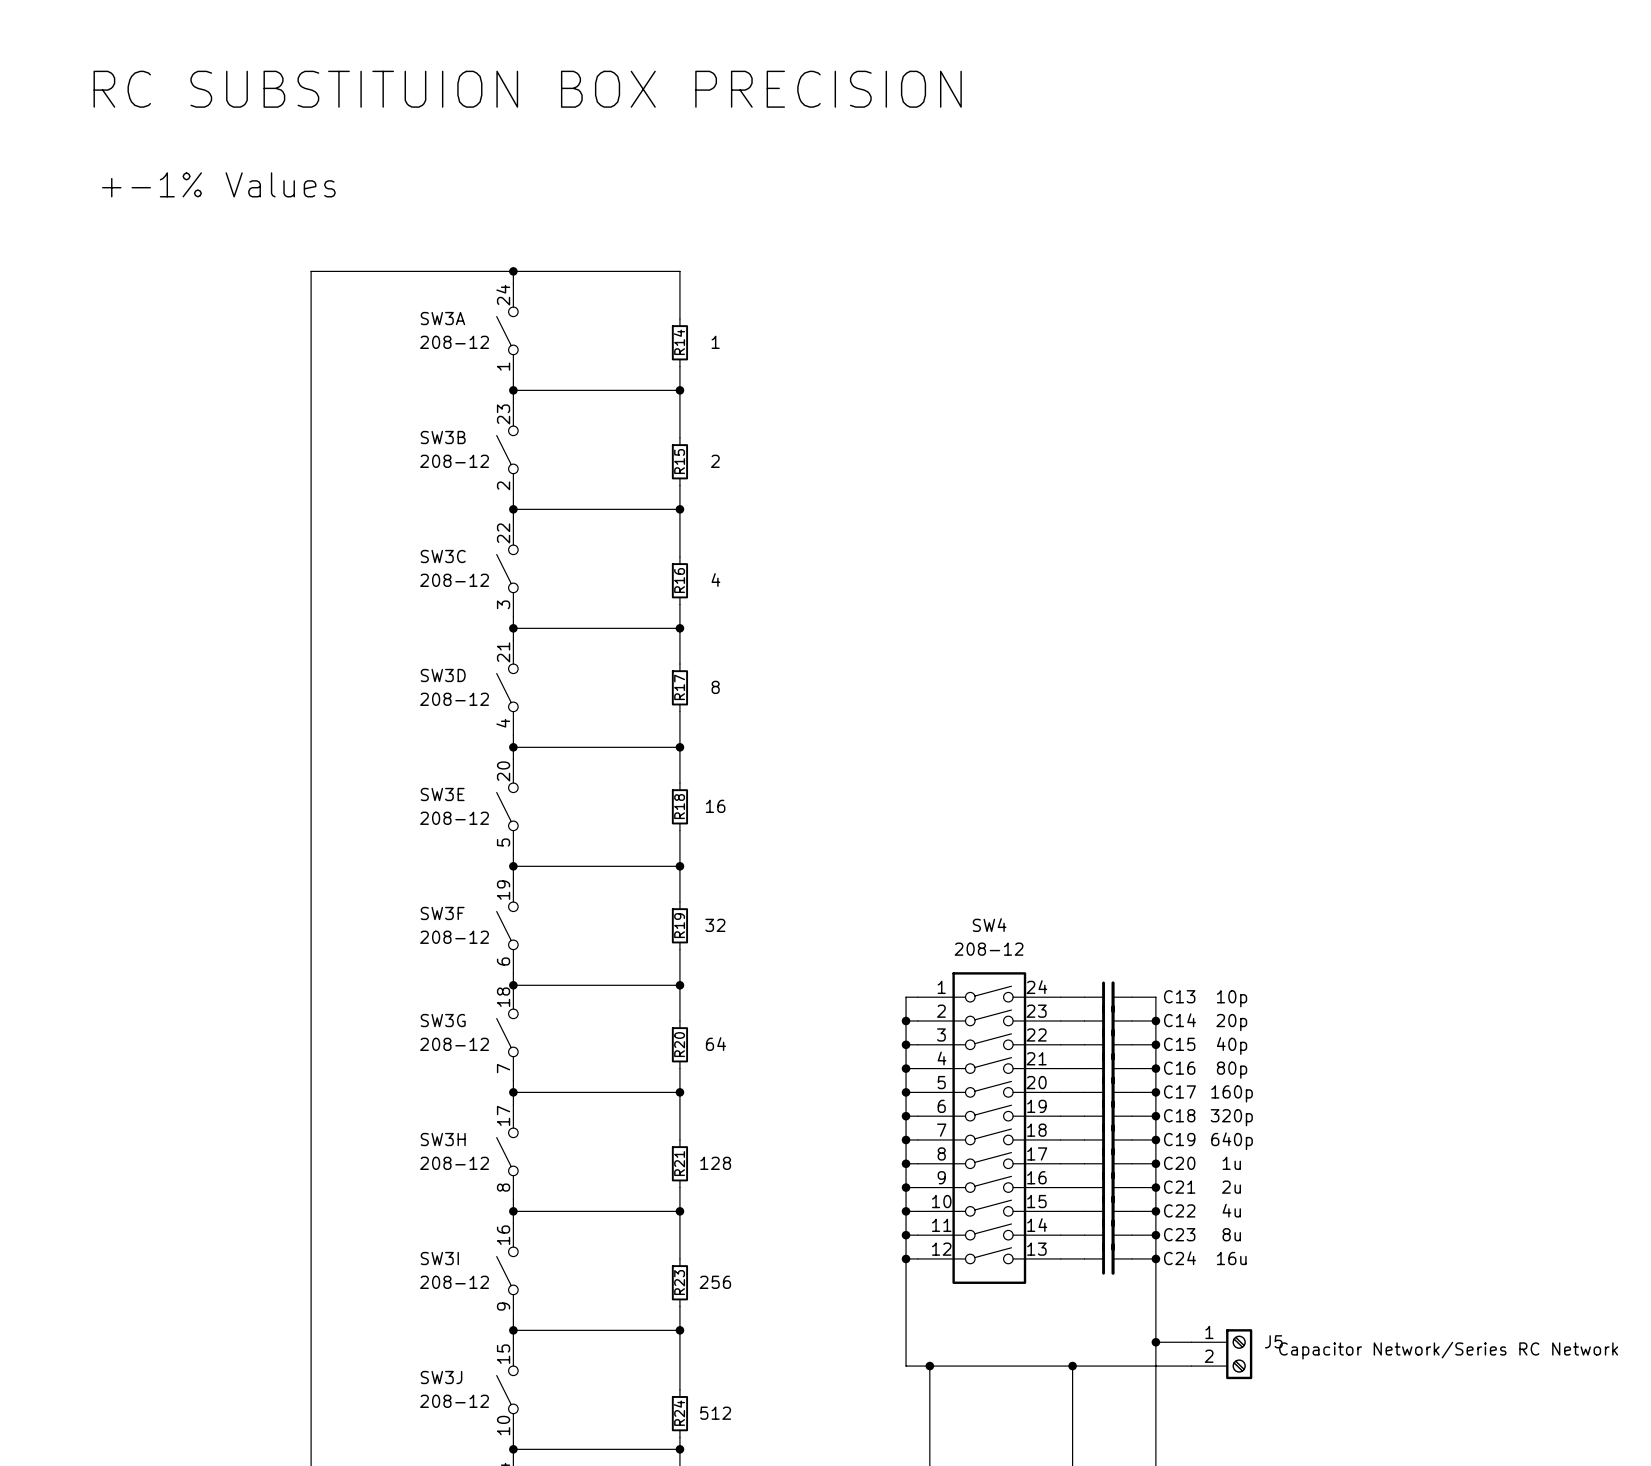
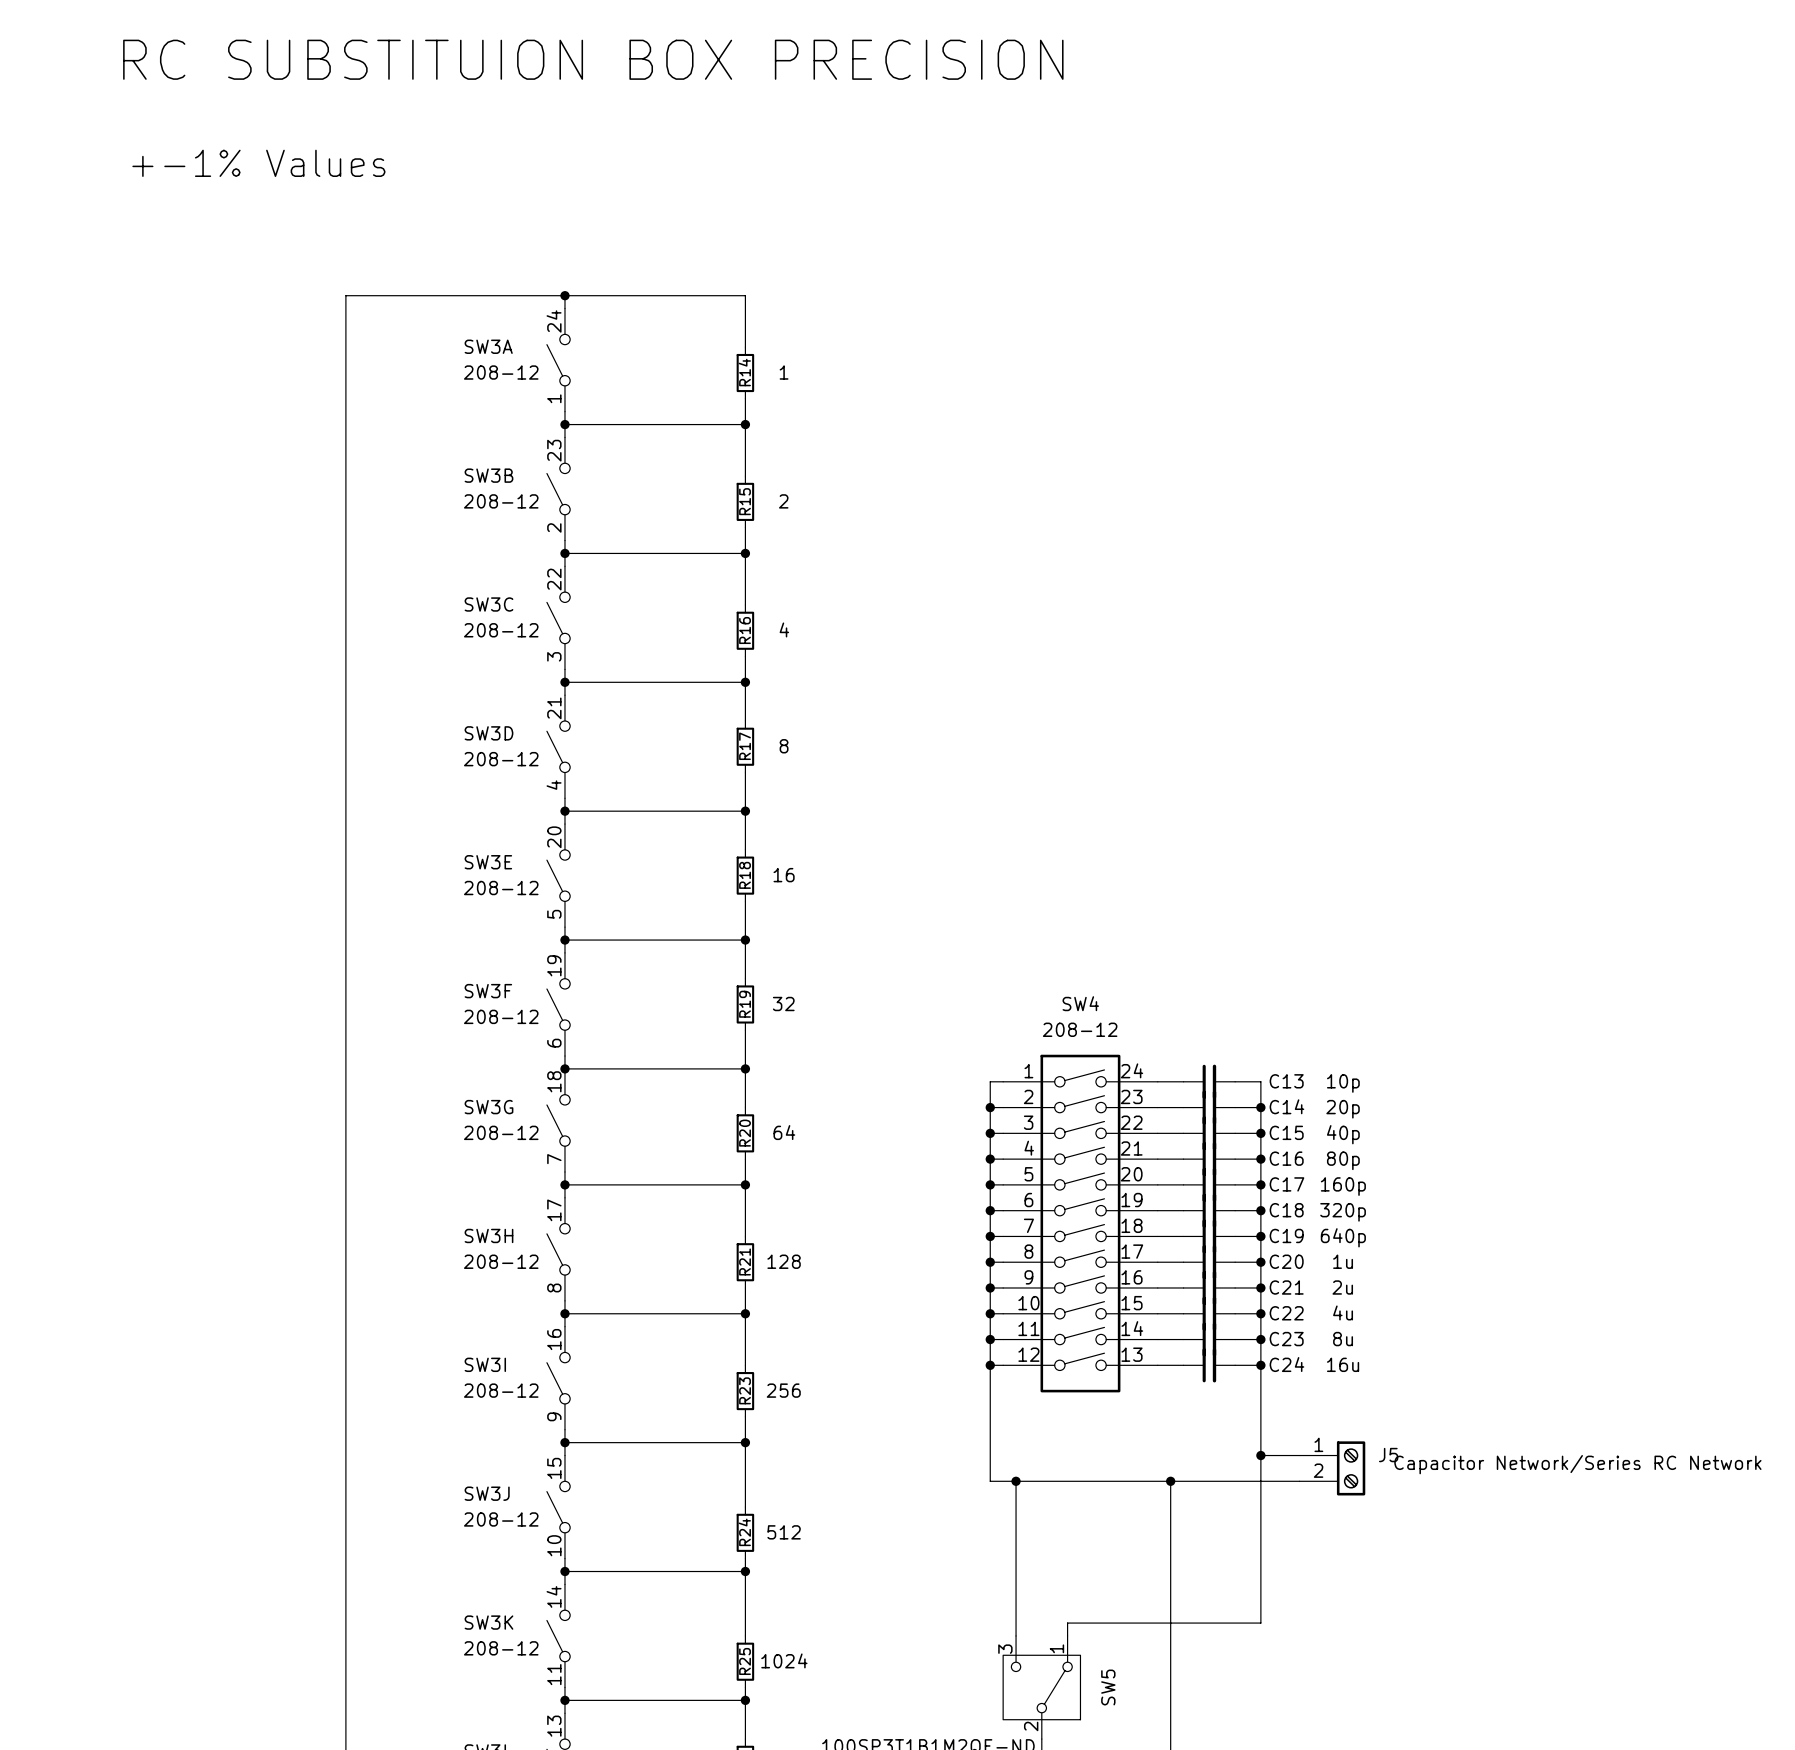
text position: RC SUBSTITUION BOX PRECISION (527, 89) -> RC SUBSTITUION BOX PRECISION (593, 59)
text position: +-1% Values (218, 184) -> +-1% Values (258, 163)

